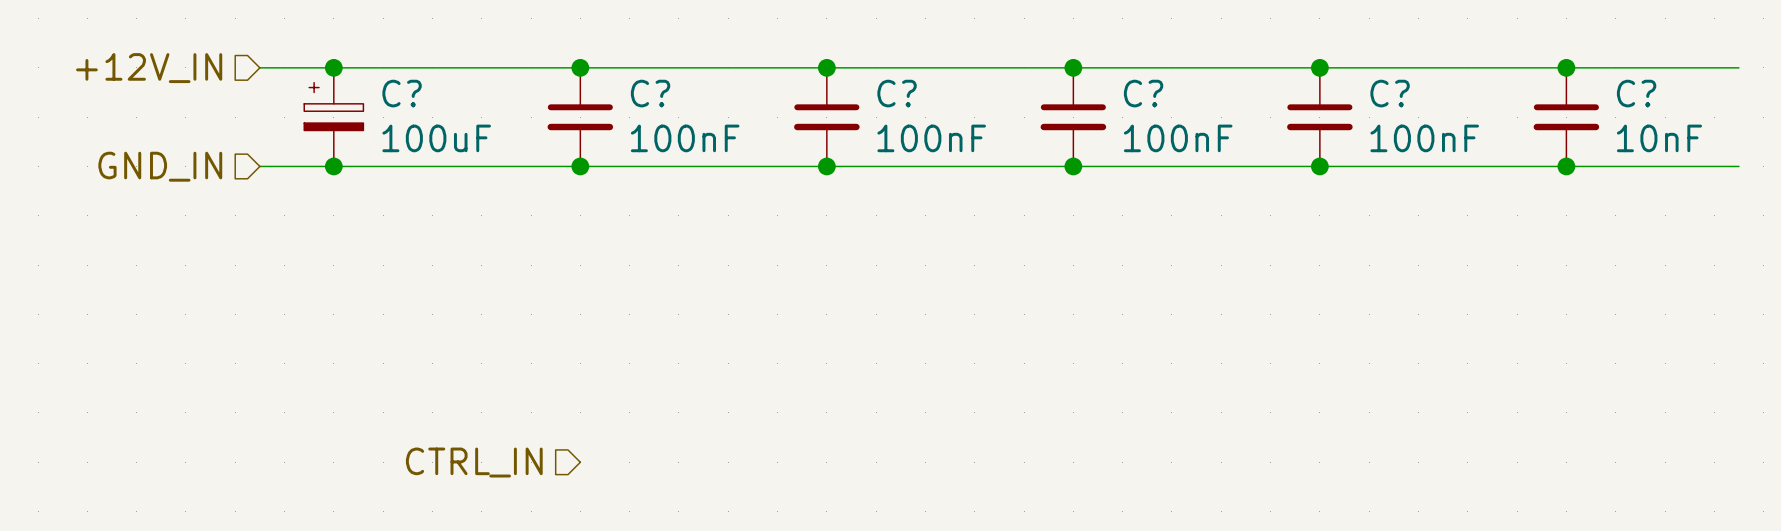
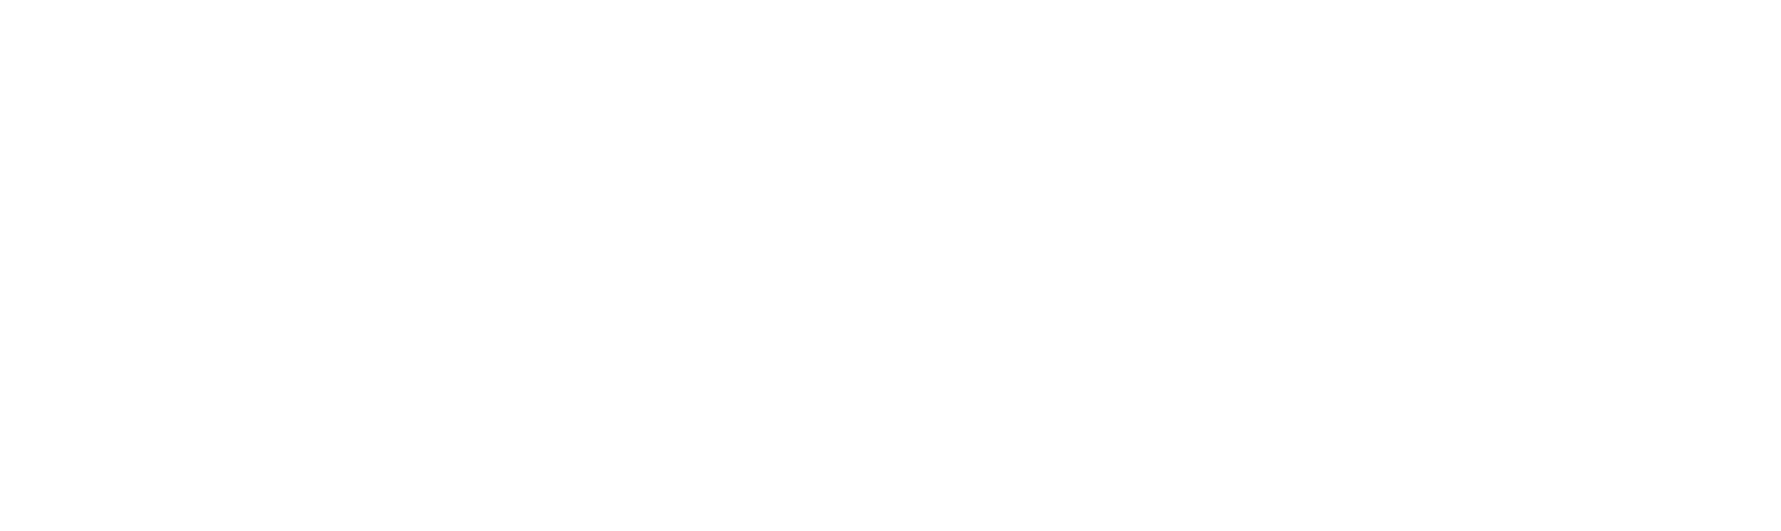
wire: (259, 67) (1738, 67) -> none
junction: (333, 67) -> none
junction: (580, 67) -> none
junction: (826, 67) -> none
junction: (1073, 67) -> none
junction: (1319, 67) -> none
junction: (1566, 67) -> none
hierarchical label: +12V_IN (149, 68) -> none
C?: 100uF (333, 117) -> none
C?: 100nF (580, 117) -> none
C?: 100nF (826, 117) -> none
C?: 100nF (1073, 117) -> none
C?: 100nF (1319, 117) -> none
C?: 10nF (1566, 117) -> none
hierarchical label: GND_IN (160, 166) -> none
wire: (259, 166) (1738, 166) -> none
junction: (333, 166) -> none
junction: (580, 166) -> none
junction: (826, 166) -> none
junction: (1073, 166) -> none
junction: (1319, 166) -> none
junction: (1566, 166) -> none
hierarchical label: CTRL_IN (474, 462) -> none

